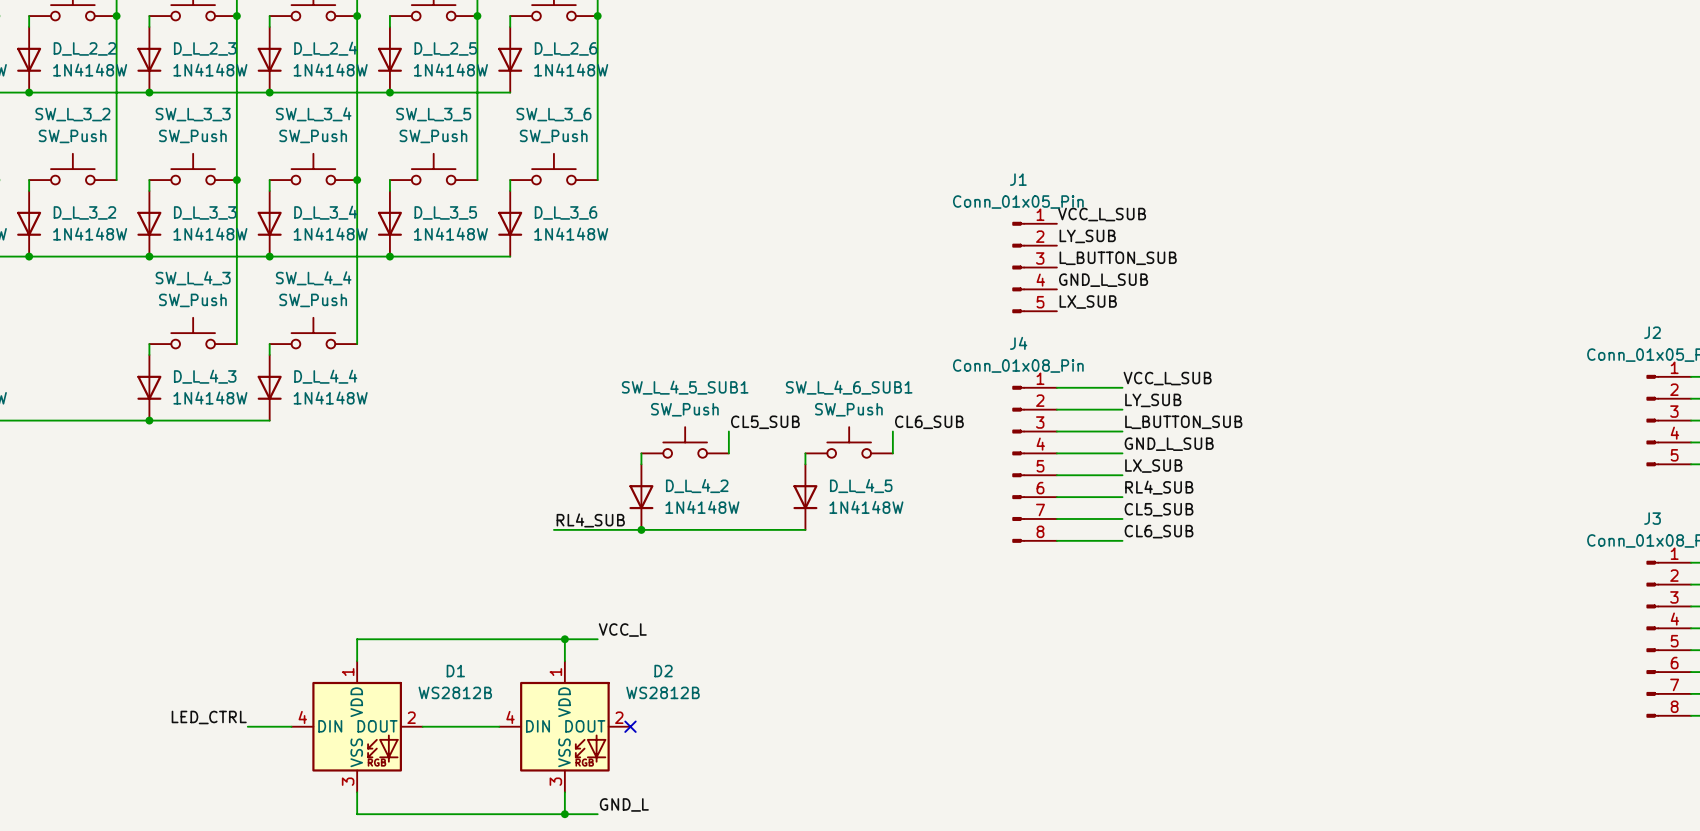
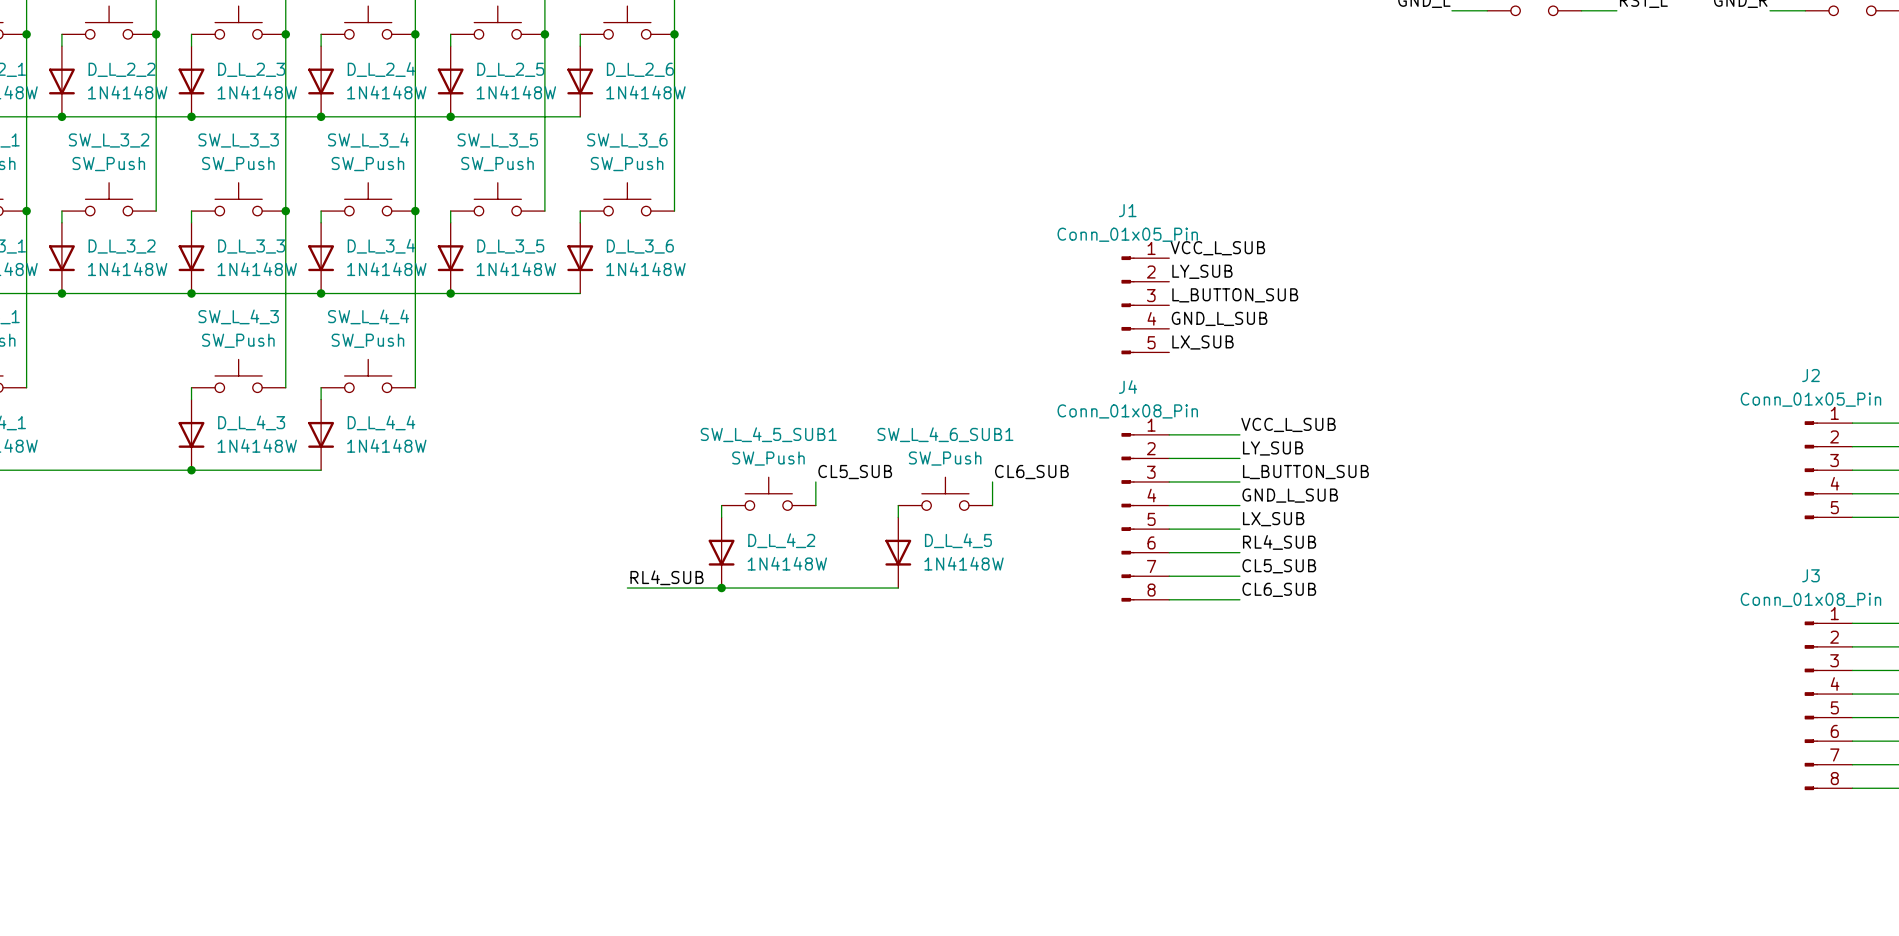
label: VCC_L (622, 630) -> none
wire: (564, 639) (564, 661) -> none
junction: (564, 639) -> none
wire: (597, 639) (357, 639) (357, 661) -> none
label: LED_CTRL (209, 717) -> none
wire: (247, 726) (291, 726) -> none
D1: WS2812B (357, 726) -> none
wire: (422, 726) (499, 726) -> none
D2: WS2812B (564, 726) -> none
no-connect mark: (630, 726) -> none
wire: (357, 792) (357, 814) (597, 814) -> none
wire: (564, 792) (564, 814) -> none
label: GND_L (624, 804) -> none
junction: (564, 814) -> none

